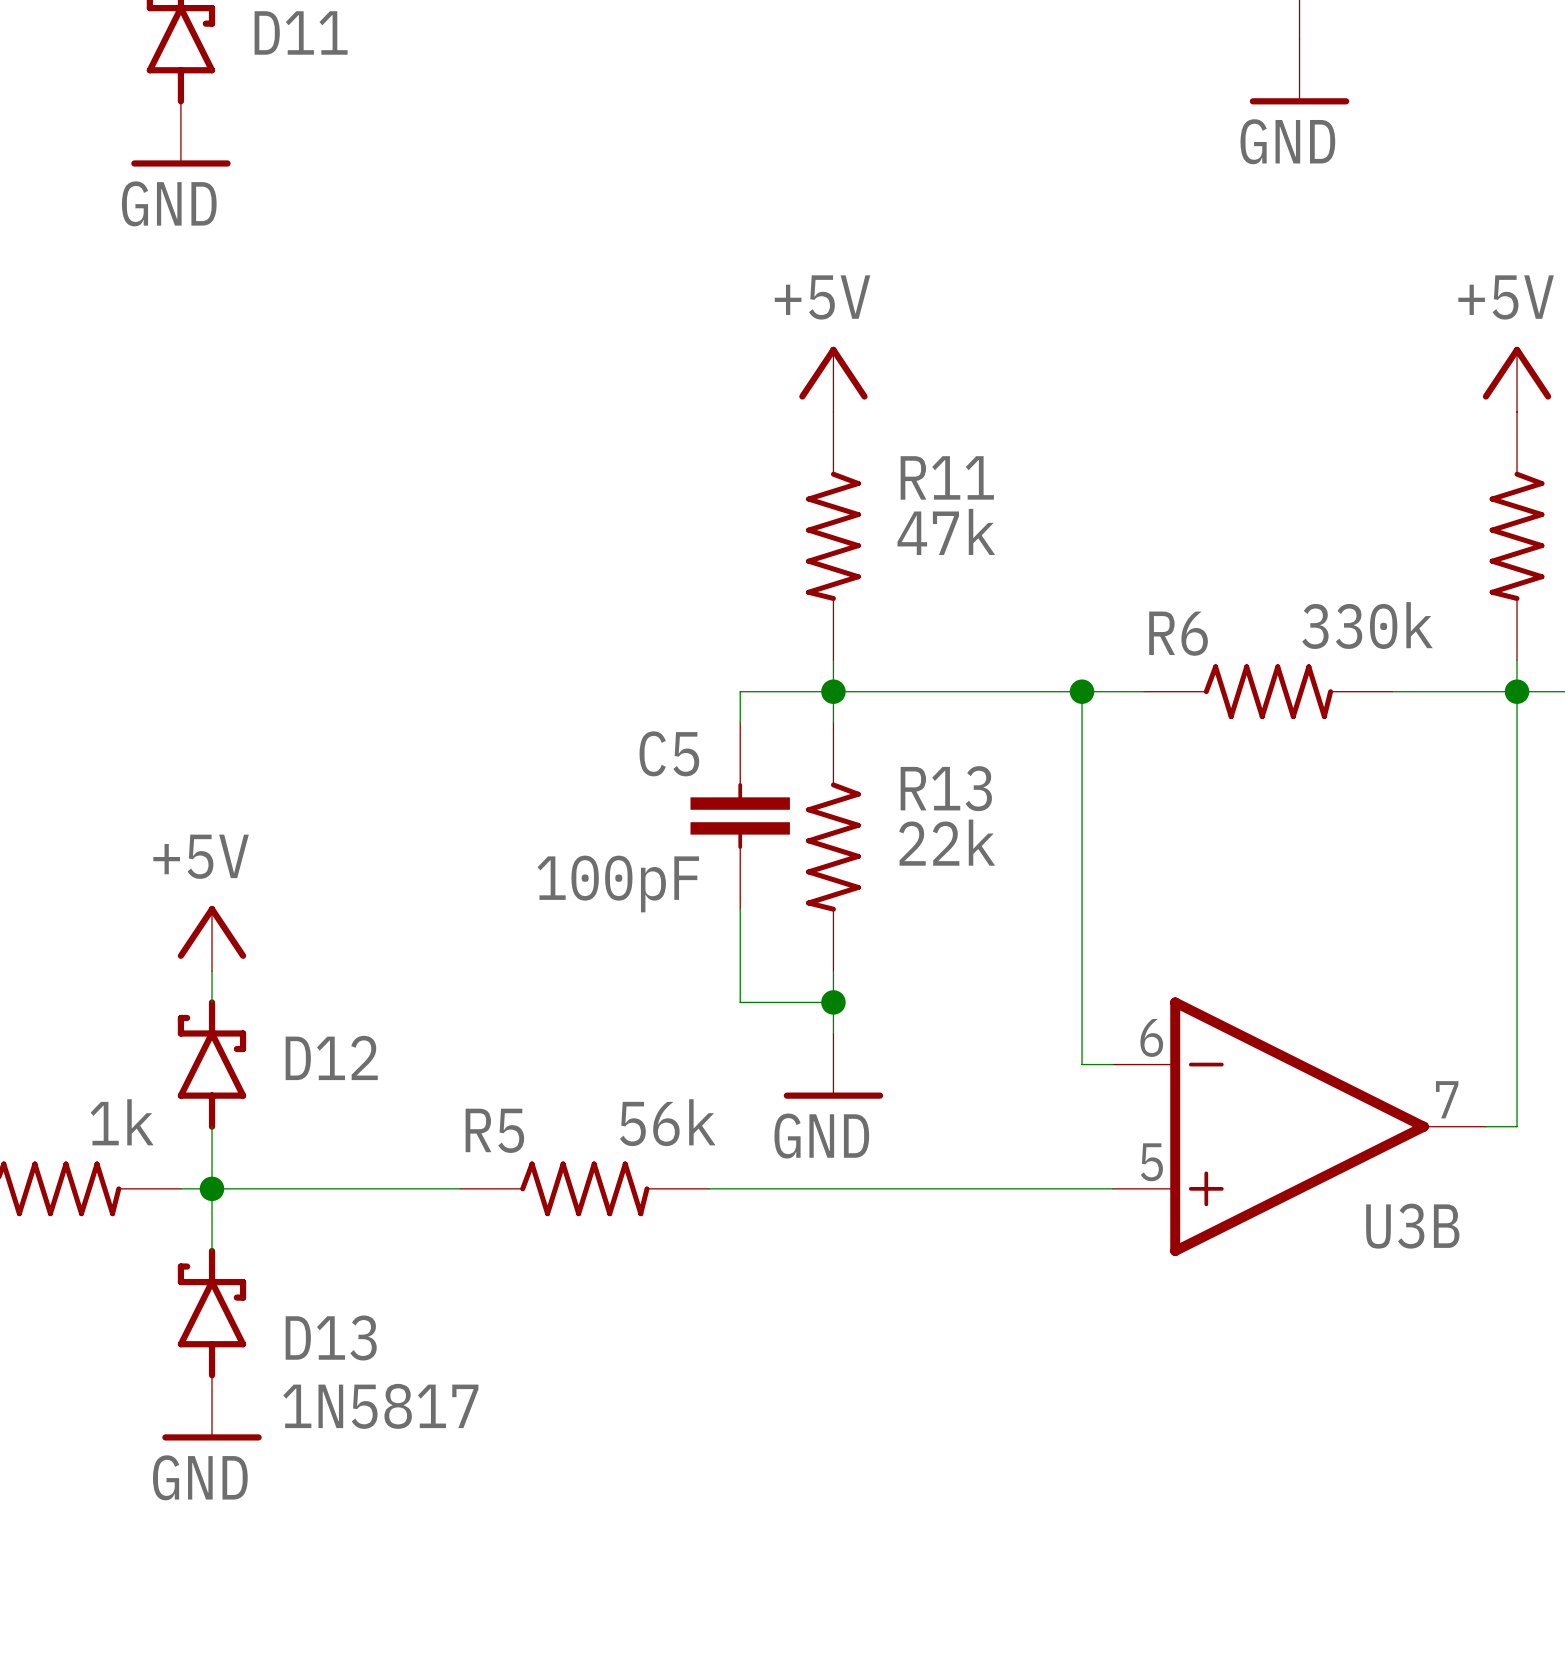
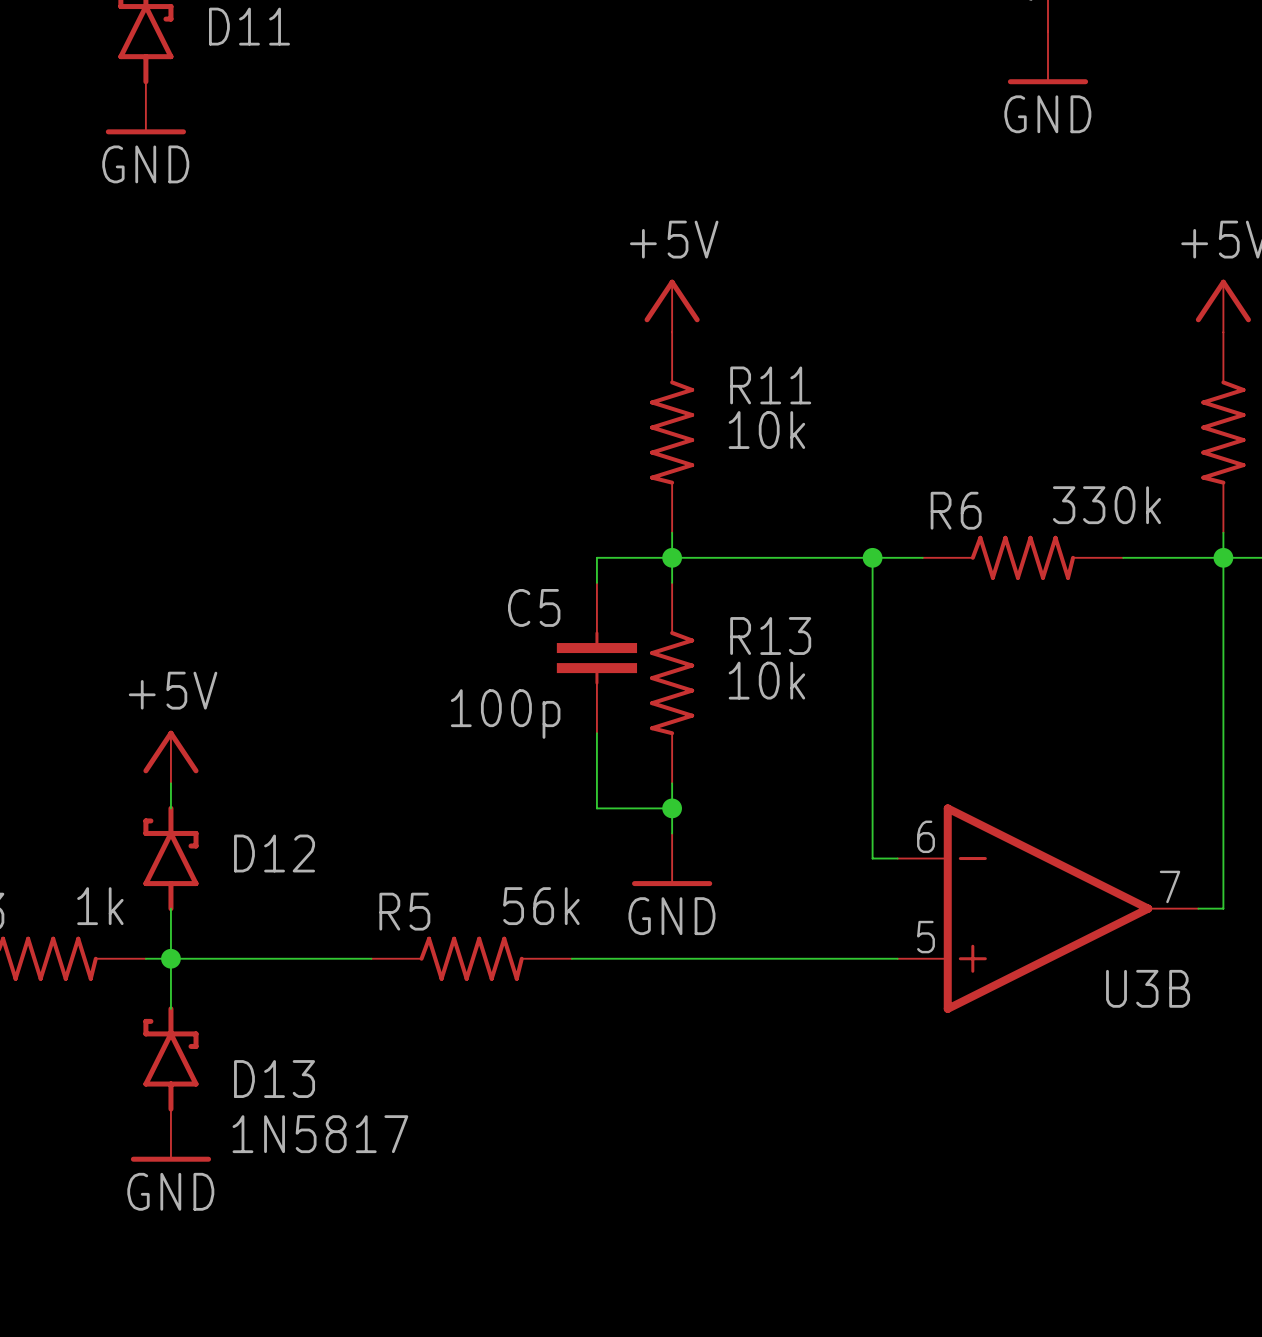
R11 value: 47k (946, 531) -> 10k (766, 430)
R13 value: 22k (947, 842) -> 10k (766, 680)
C5 value: 100pF (618, 883) -> 100p (505, 714)

